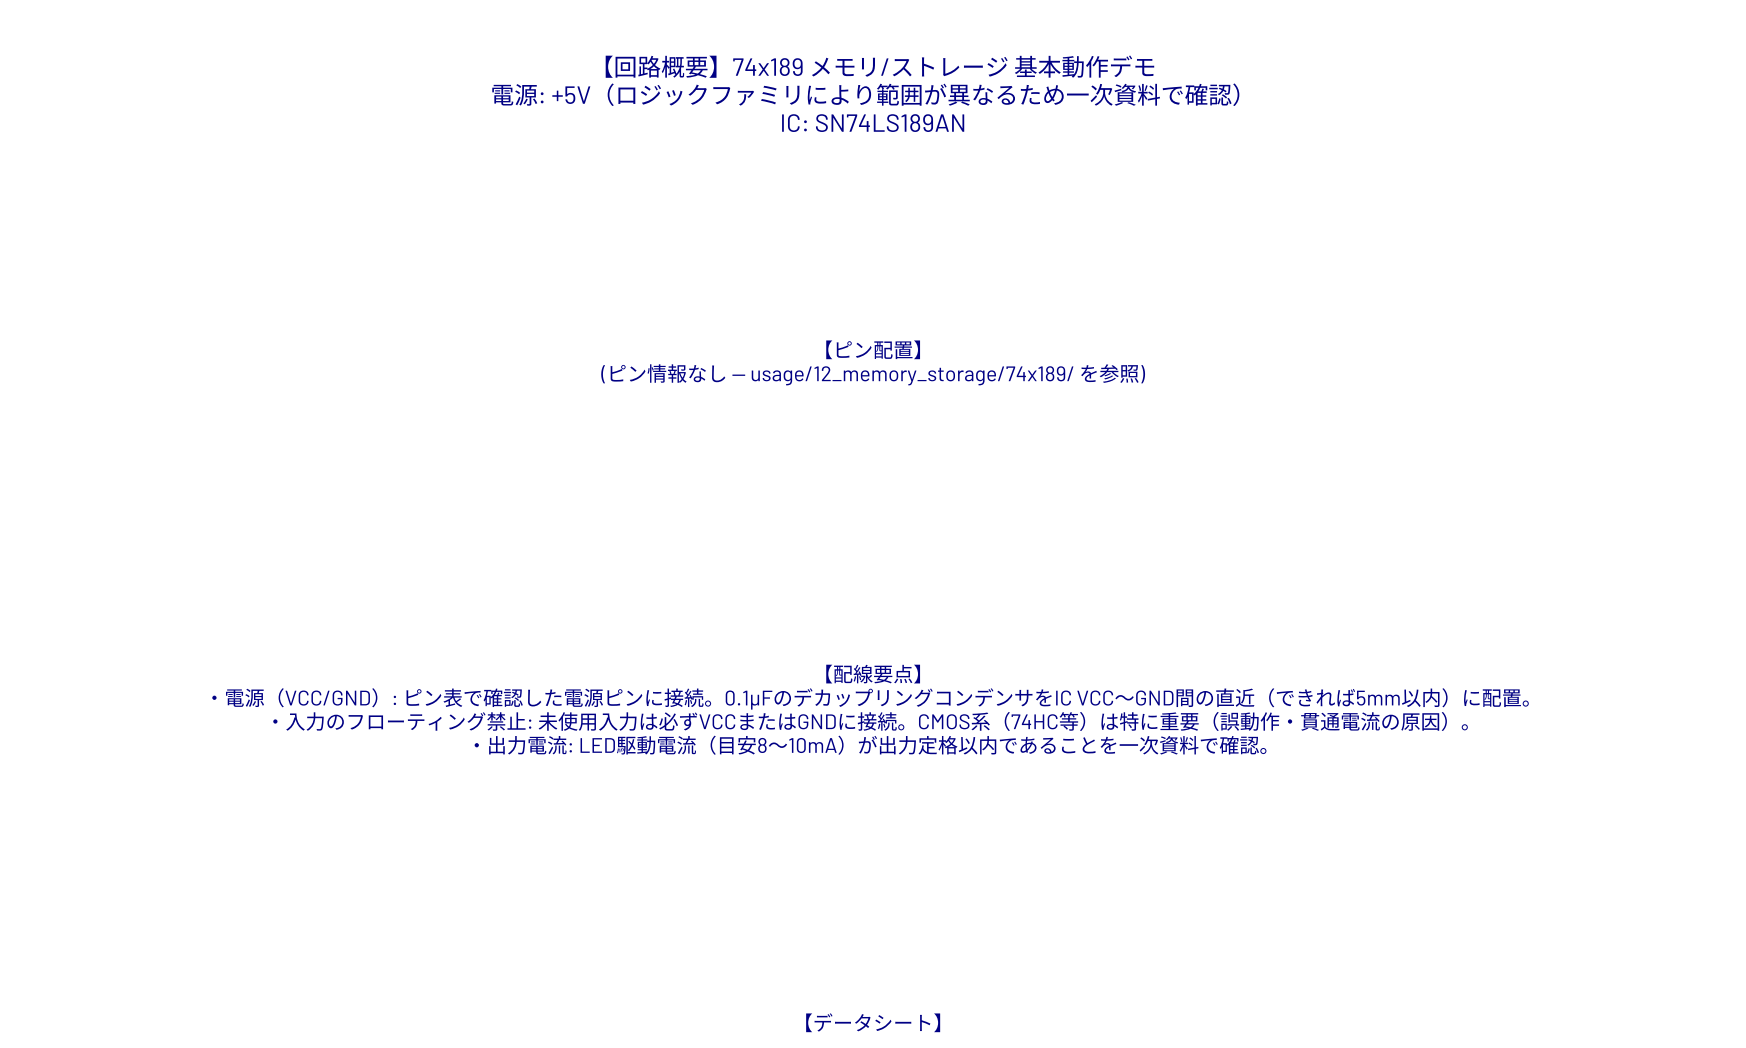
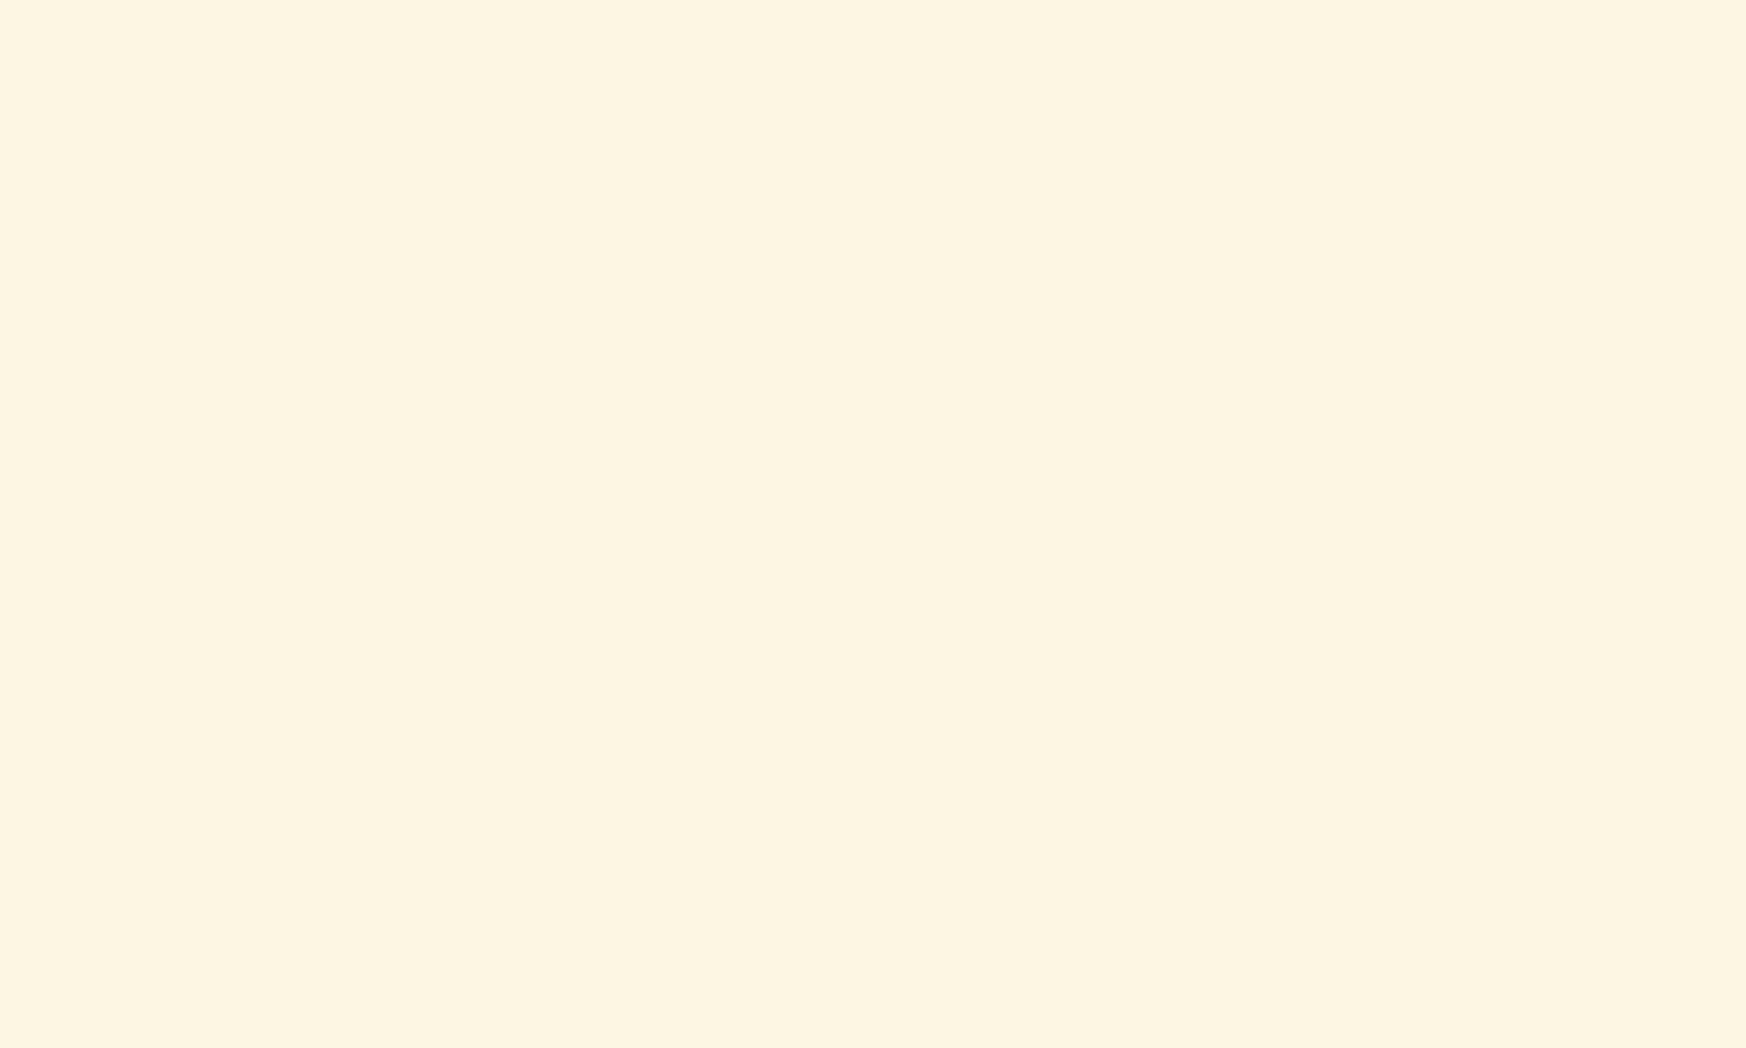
text: 【回路概要】74x189 メモリ/ストレージ 基本動作デモ (879, 66) -> none
text: 電源: +5V（ロジックファミリにより範囲が異なるため一次資料で確認） (865, 94) -> none
text: IC: SN74LS189AN (873, 123) -> none
text: 【ピン配置】 (873, 349) -> none
text: (ピン情報なし — usage/12_memory_storage/74x189/ を参照) (873, 374) -> none
text: 【配線要点】 (873, 674) -> none
text: ・電源（VCC/GND）: ピン表で確認した電源ピンに接続。0.1µFのデカップリングコンデンサをIC VCC〜GND間の直近（できれば5mm以内）に配置。 (870, 698) -> none
text: ・入力のフローティング禁止: 未使用入力は必ずVCCまたはGNDに接続。CMOS系（74HC等）は特に重要（誤動作・貫通電流の原因）。 (870, 721) -> none
text: ・出力電流: LED駆動電流（目安8〜10mA）が出力定格以内であることを一次資料で確認。 (870, 745) -> none
text: 【データシート】 (873, 1022) -> none

